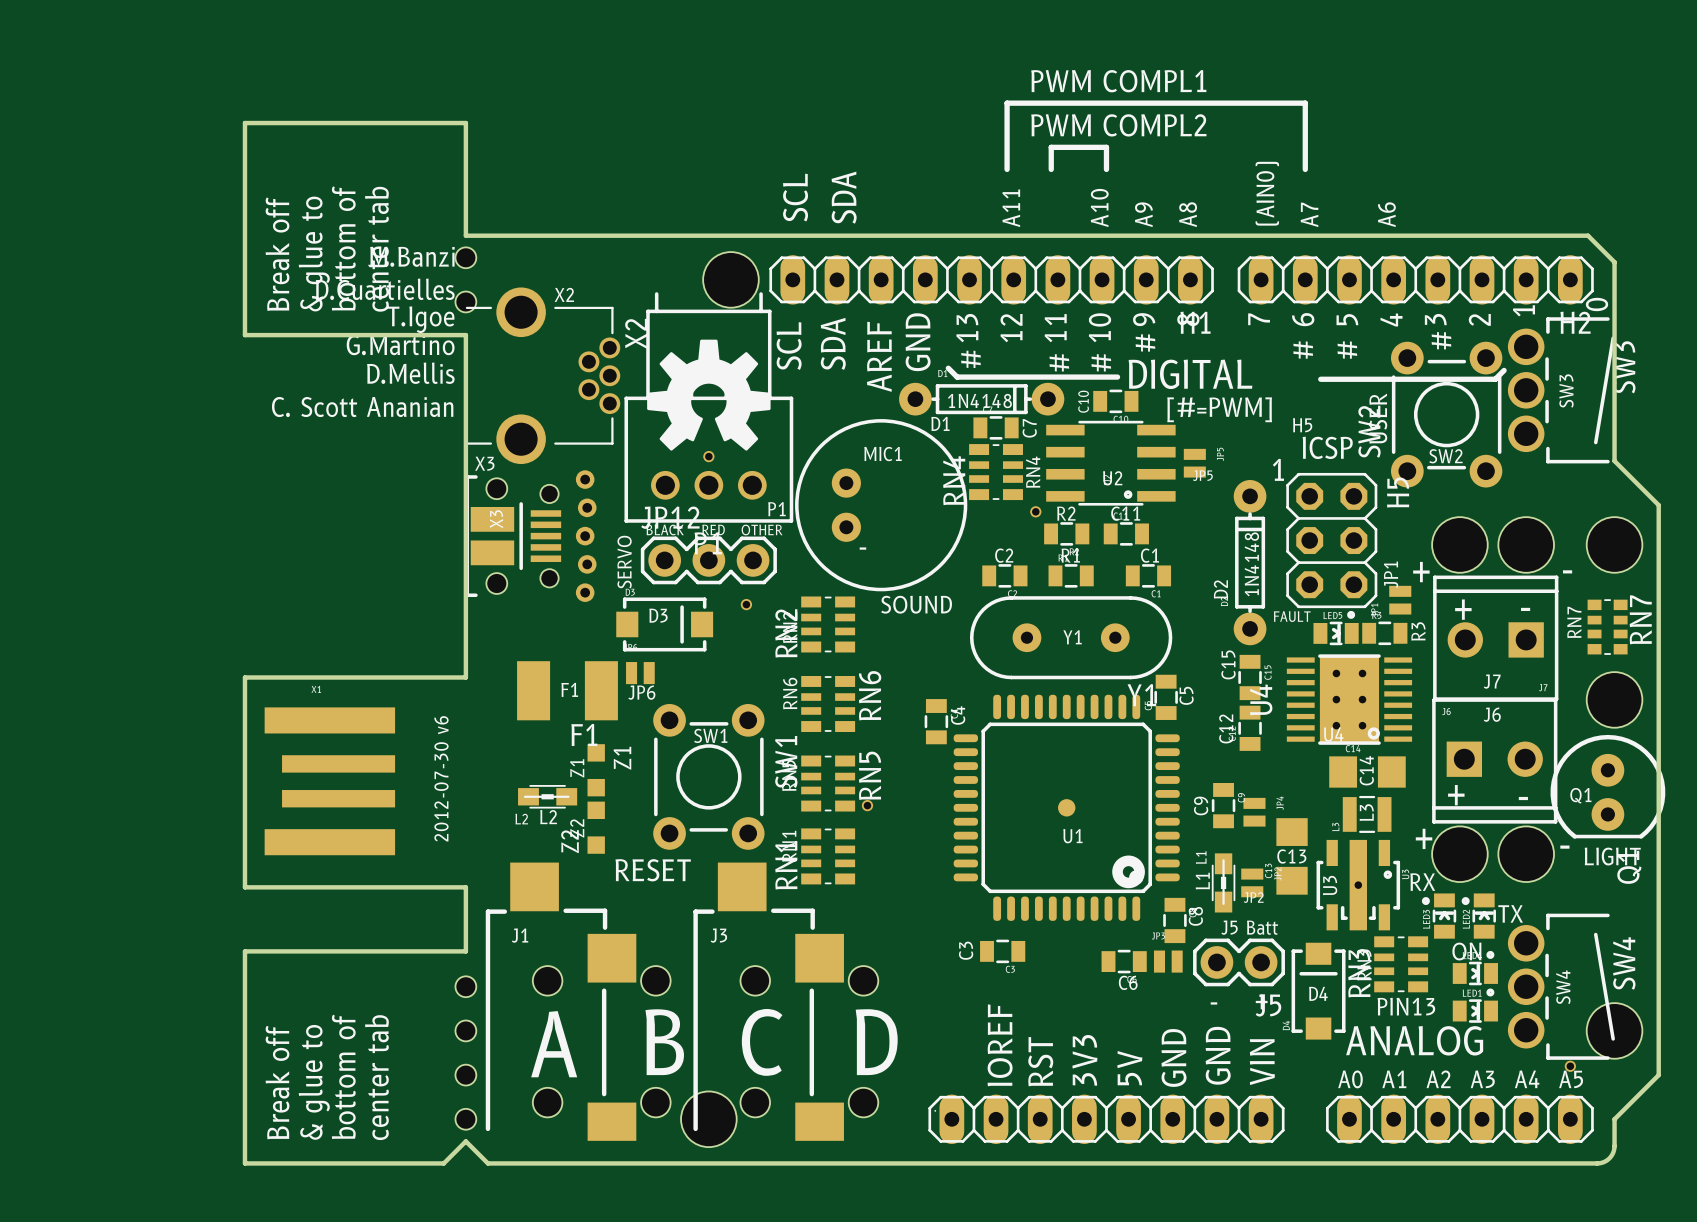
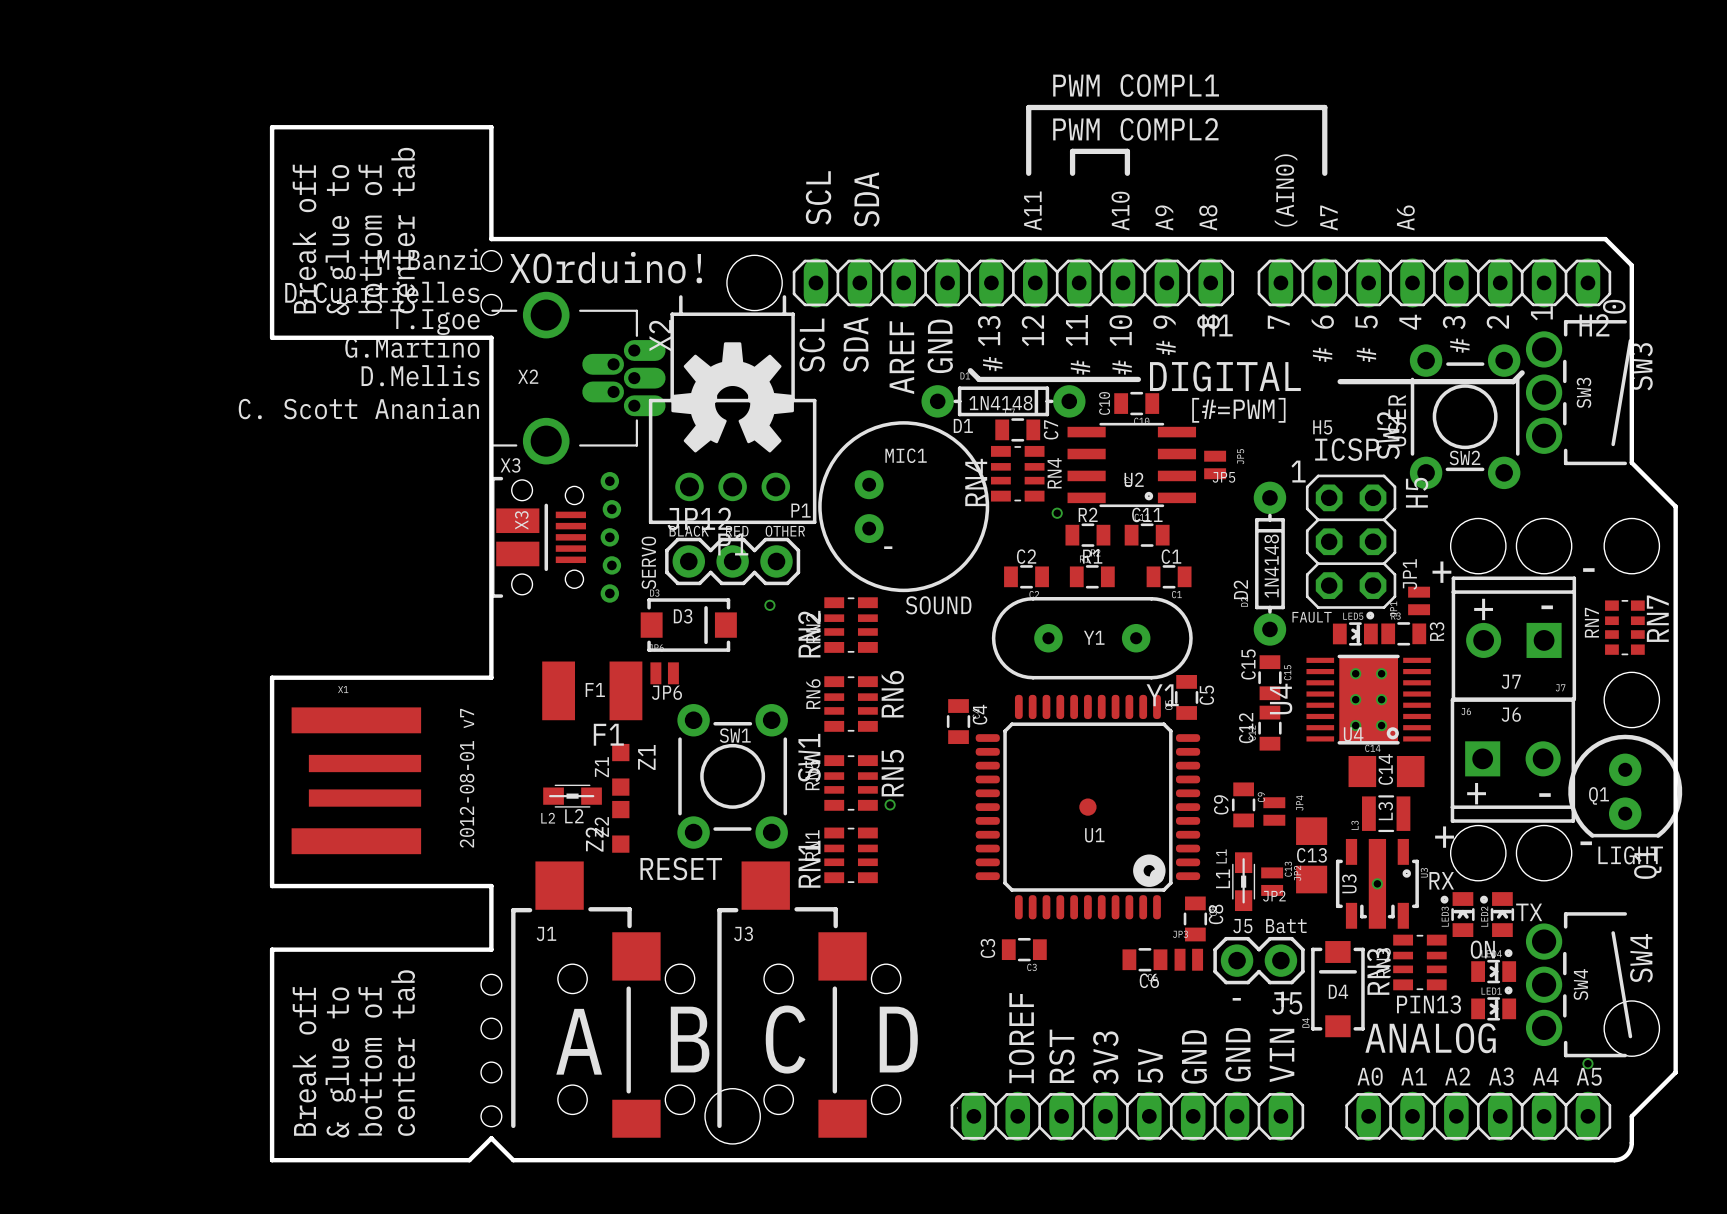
text: none -> XOrduino! (605, 267)
X2 footprint: [465, 287, 621, 465] -> [491, 291, 666, 465]
text position: X2 (564, 294) -> X2 (528, 376)
part: (708, 456) -> none
text: 2012-07-30 v6 (441, 778) -> 2012-08-01 v7 (467, 778)

